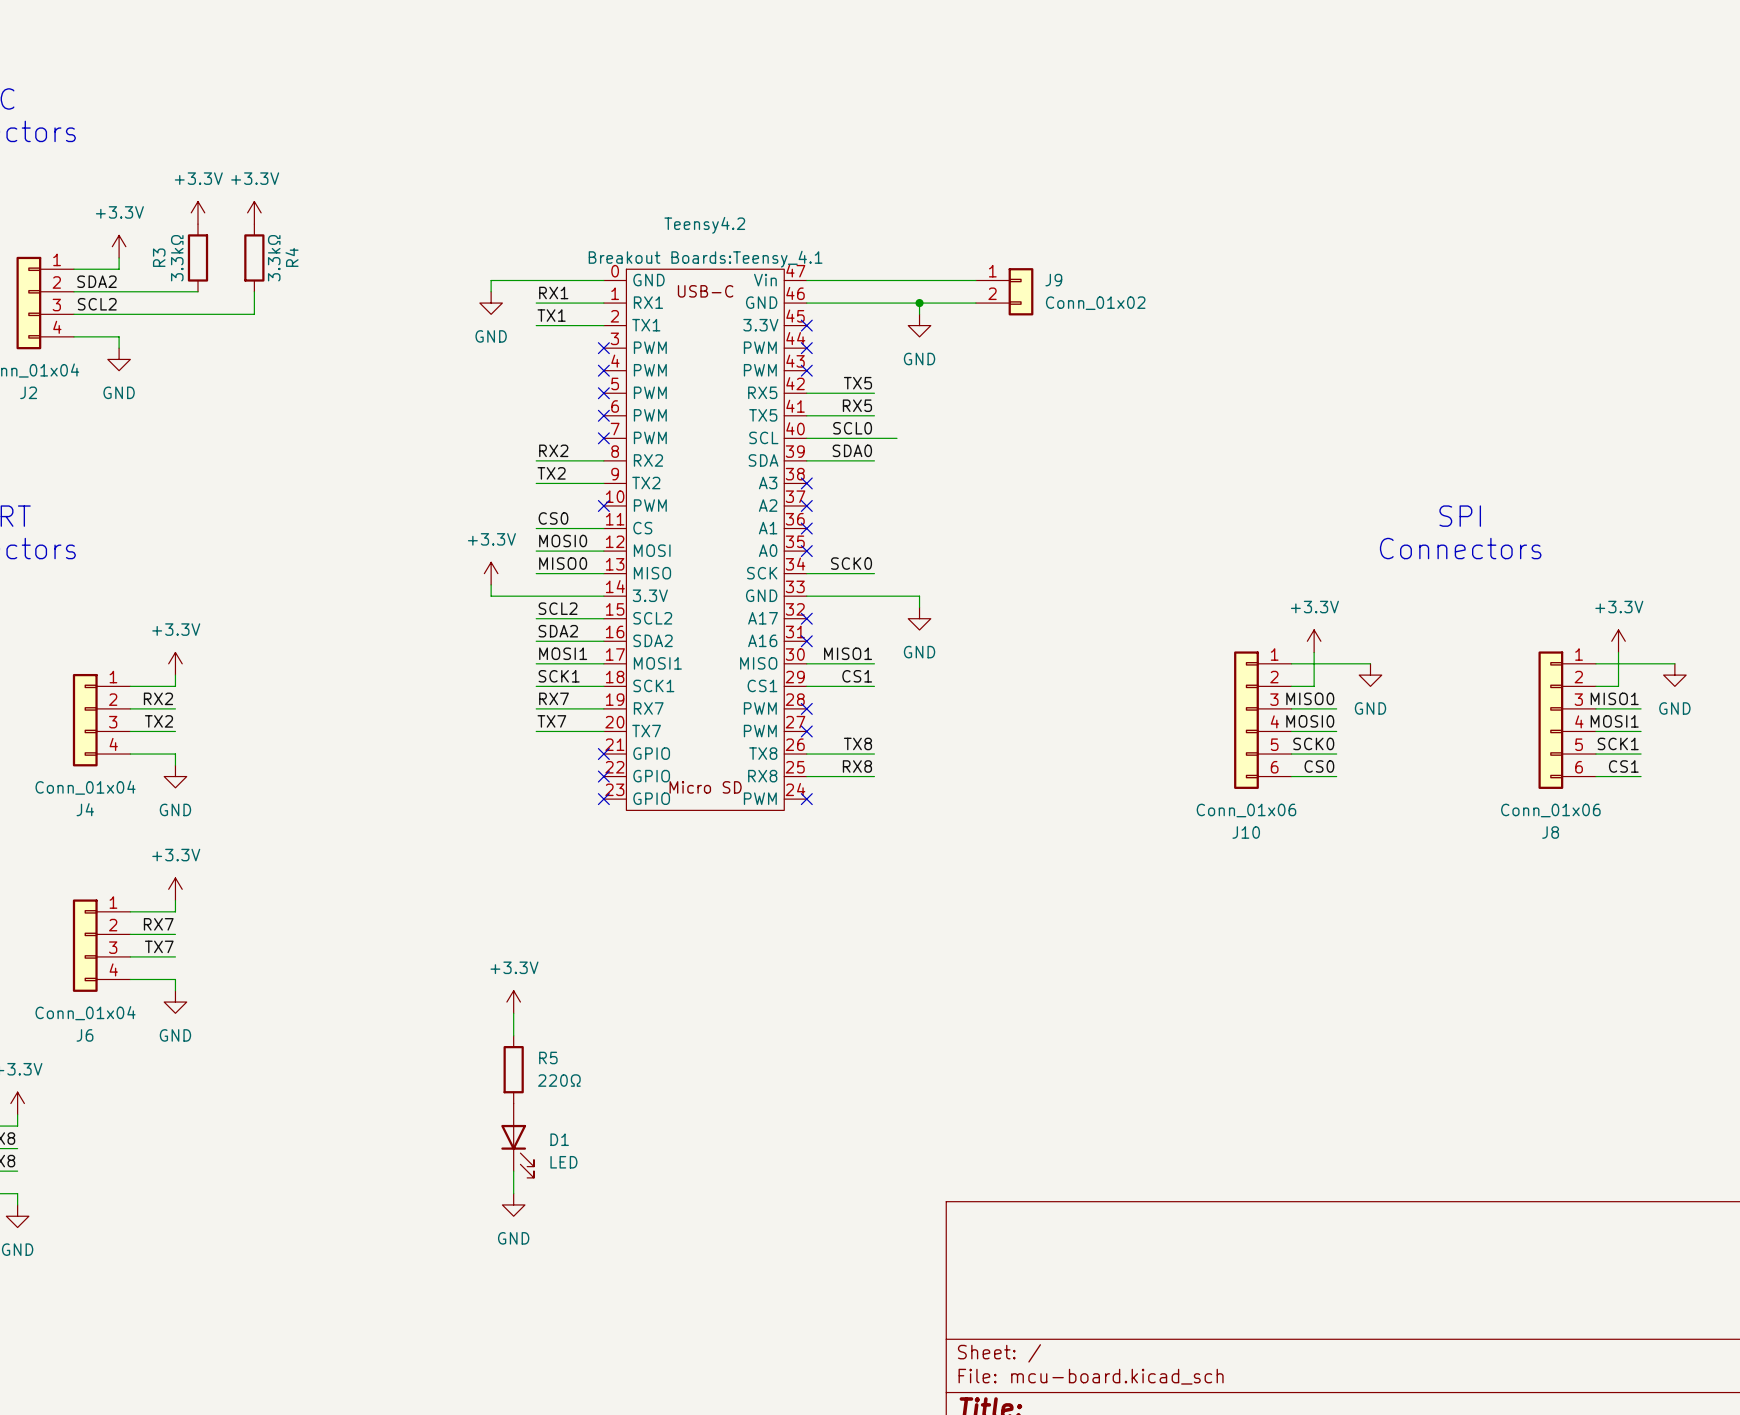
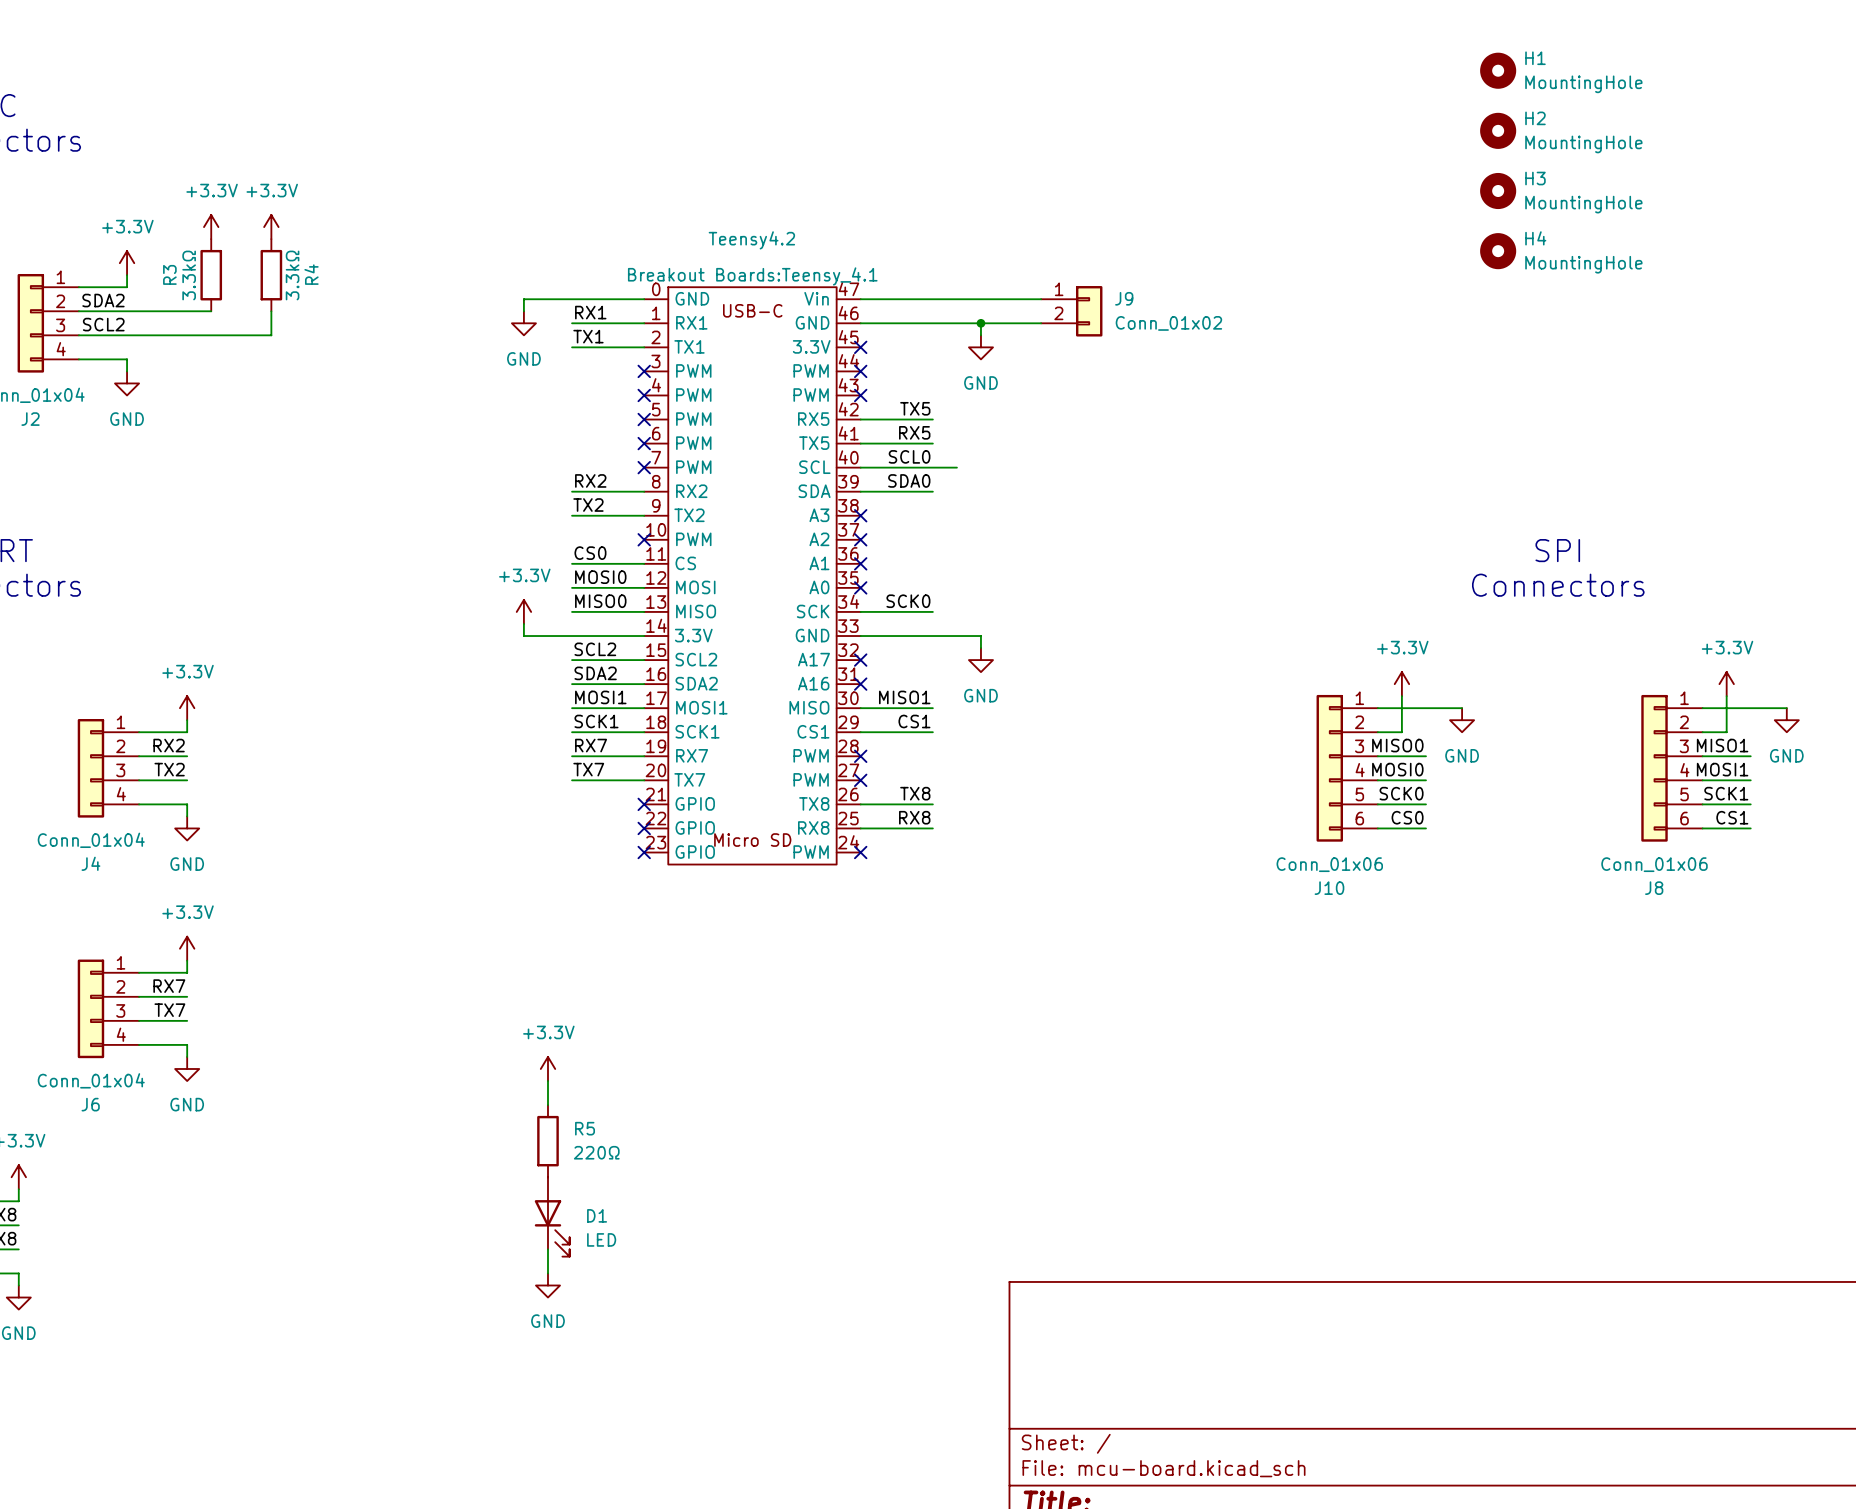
H1: none -> MountingHole (1498, 70)
H2: none -> MountingHole (1498, 130)
H3: none -> MountingHole (1498, 191)
H4: none -> MountingHole (1498, 251)

